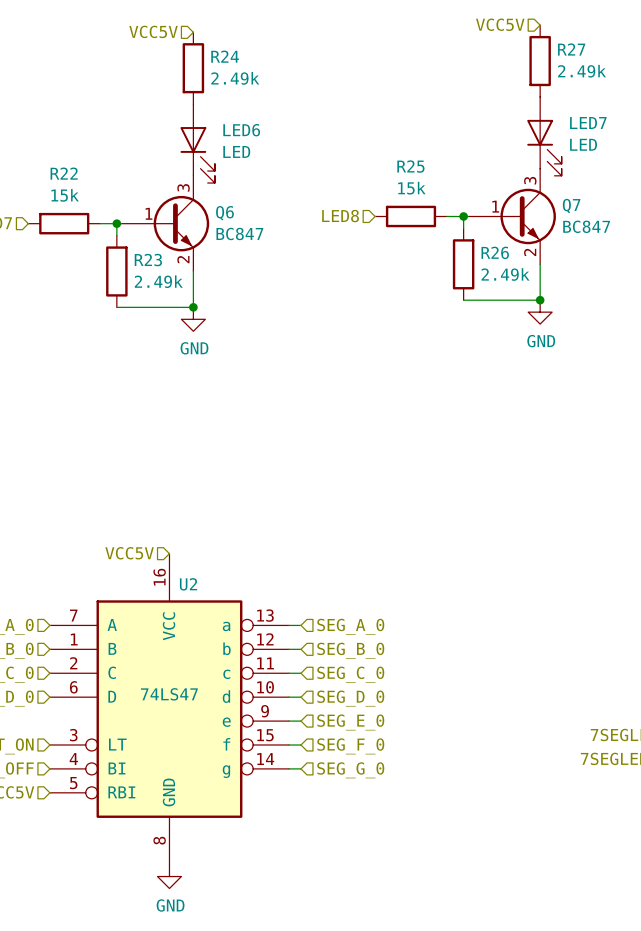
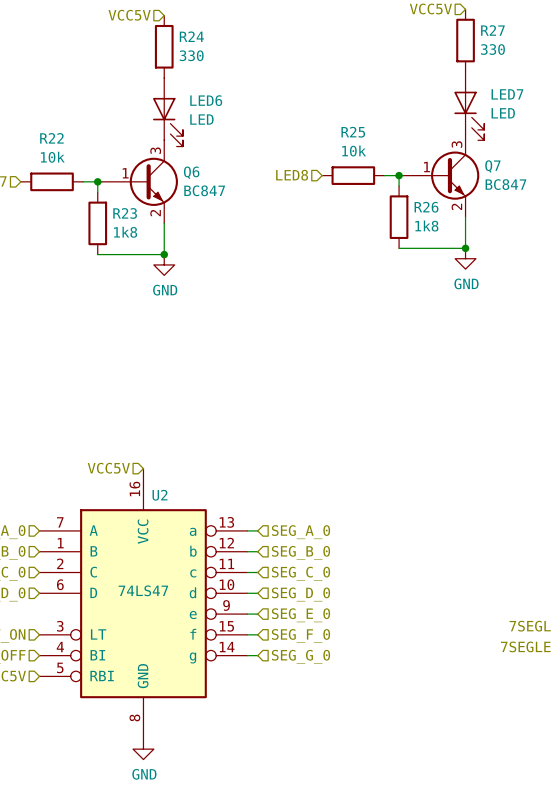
R27 value: 2.49k (582, 71) -> 330 (492, 49)
R24 value: 2.49k (235, 78) -> 330 (191, 55)
R25 value: 15k (411, 188) -> 10k (354, 151)
R22 value: 15k (65, 195) -> 10k (52, 157)
R26 value: 2.49k (505, 274) -> 1k8 (426, 226)
R23 value: 2.49k (158, 281) -> 1k8 (125, 232)

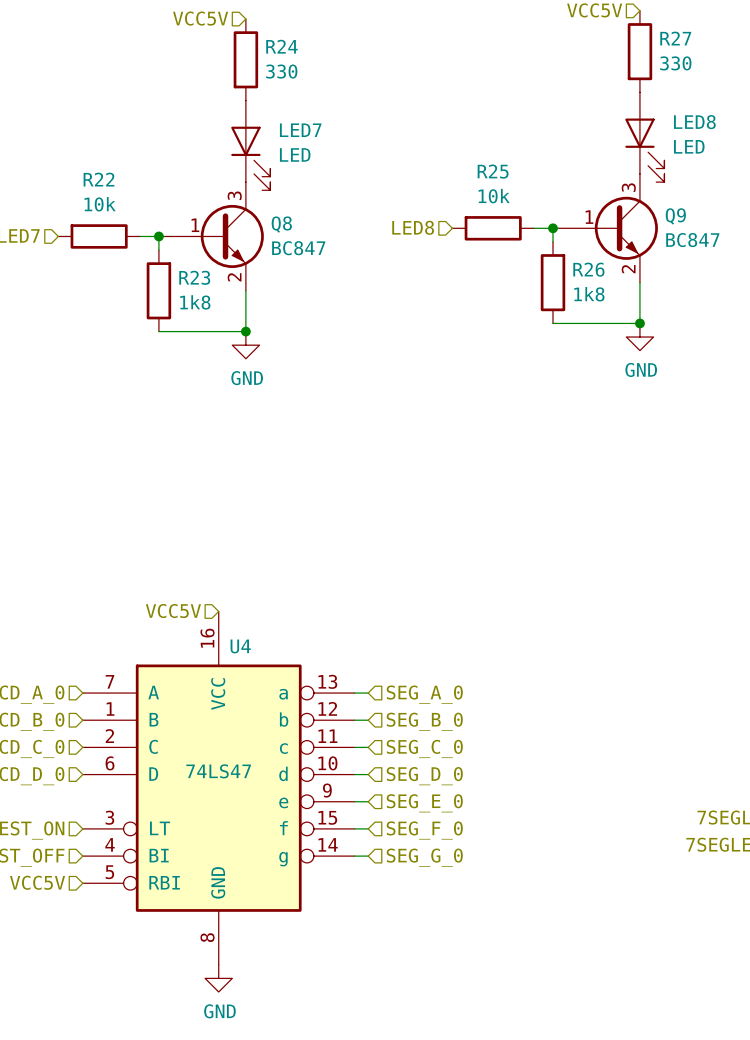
LED7 name: LED7 (507, 94) -> LED8 (694, 122)
LED6 name: LED6 (206, 100) -> LED7 (300, 130)
Q7 name: Q7 (492, 166) -> Q9 (675, 216)
Q6 name: Q6 (191, 172) -> Q8 (281, 224)
U2 name: U2 (159, 495) -> U4 (240, 646)

